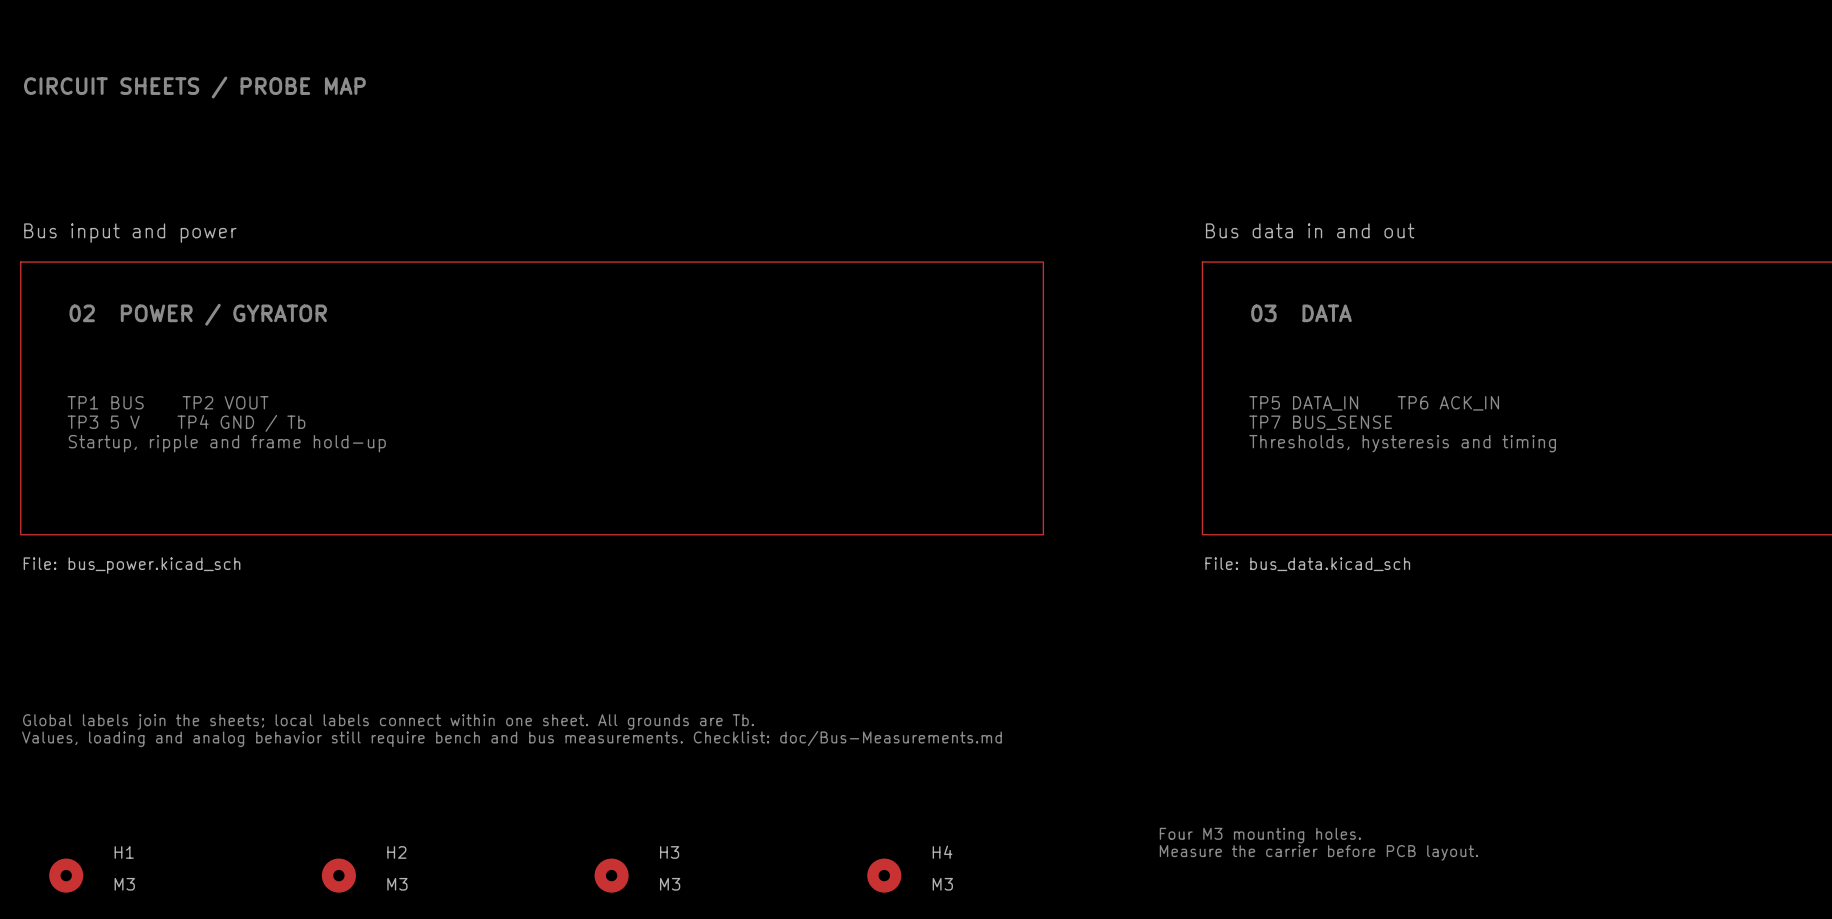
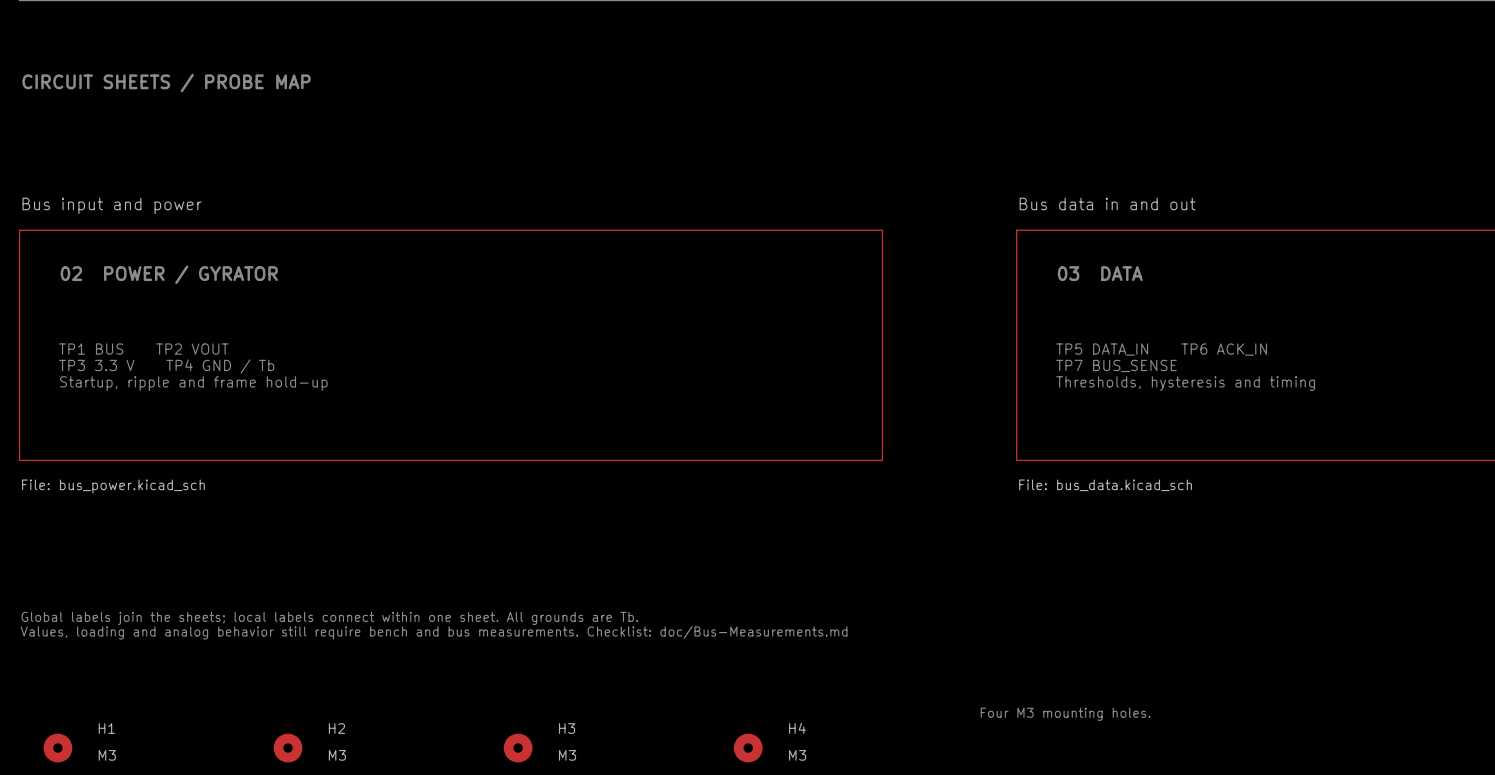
text: TP3 5 V TP4 GND / Tb (186, 423) -> TP3 3.3 V TP4 GND / Tb (166, 366)
text: Measure the carrier before PCB layout. (1318, 852) -> none

